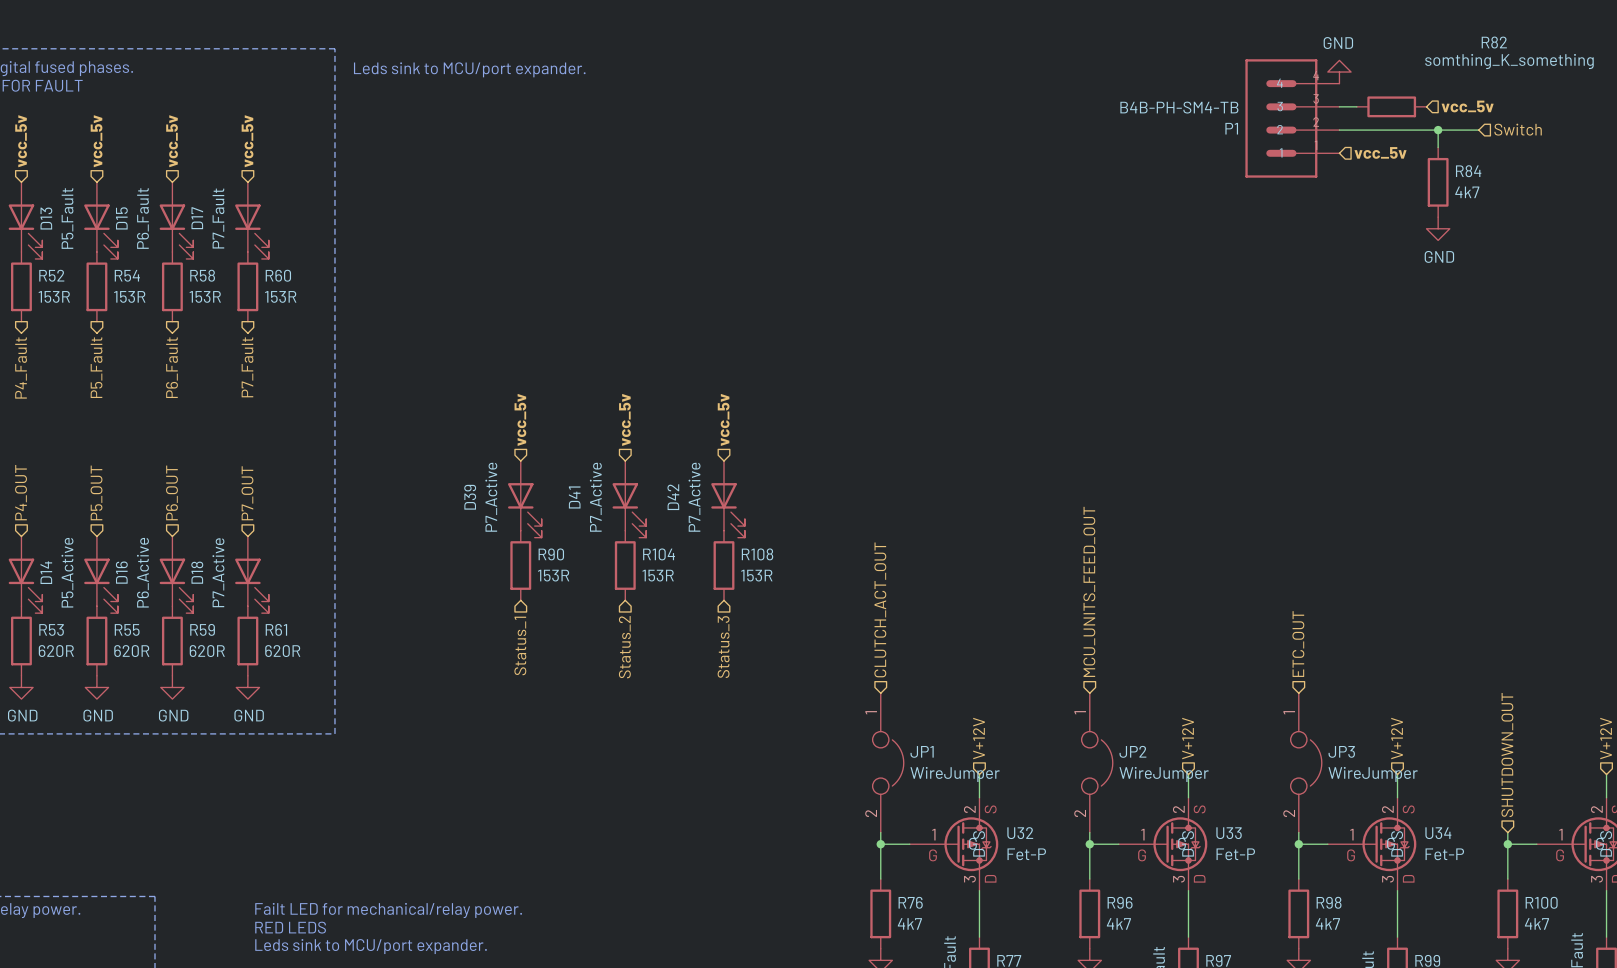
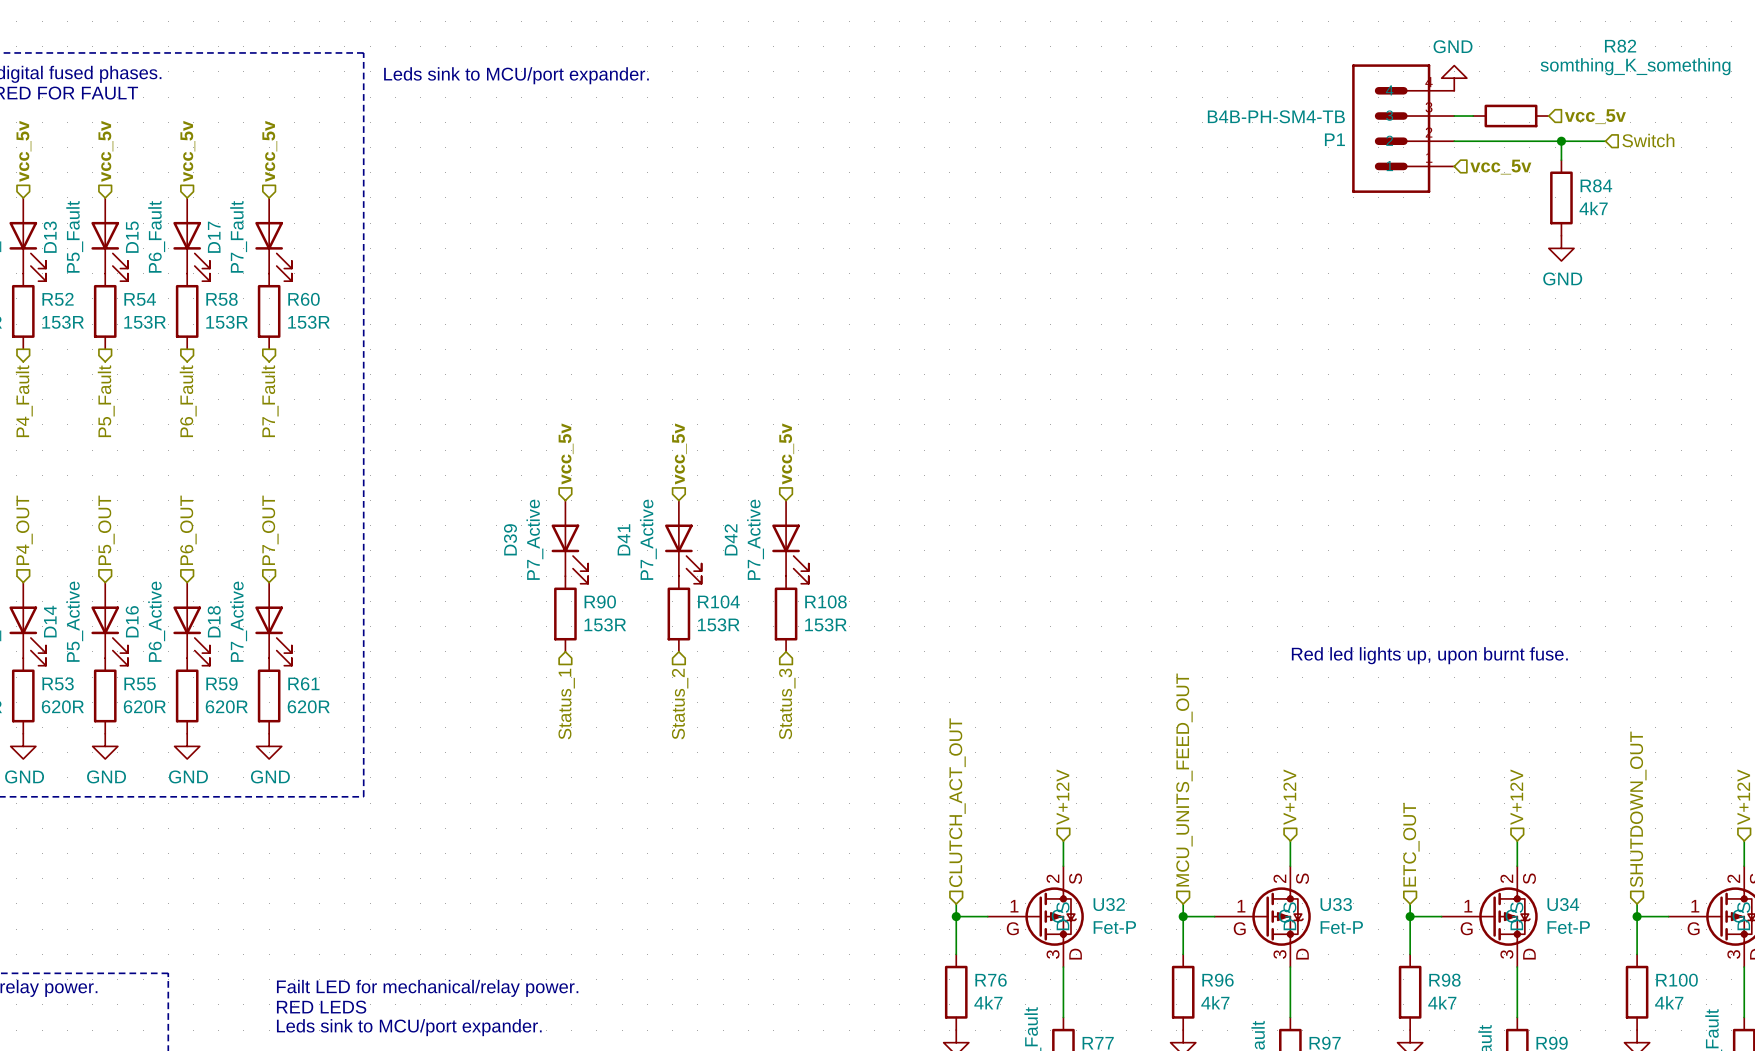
hierarchical label position: MCU_UNITS_FEED_OUT (1089, 591) -> MCU_UNITS_FEED_OUT (1184, 780)
text: none -> Red led lights up, upon burnt fuse. (1429, 655)
hierarchical label position: CLUTCH_ACT_OUT (880, 609) -> CLUTCH_ACT_OUT (957, 802)
hierarchical label position: ETC_OUT (1298, 644) -> ETC_OUT (1411, 844)
JP1: WireJumper (888, 762) -> none
JP2: WireJumper (1097, 762) -> none
JP3: WireJumper (1306, 762) -> none

